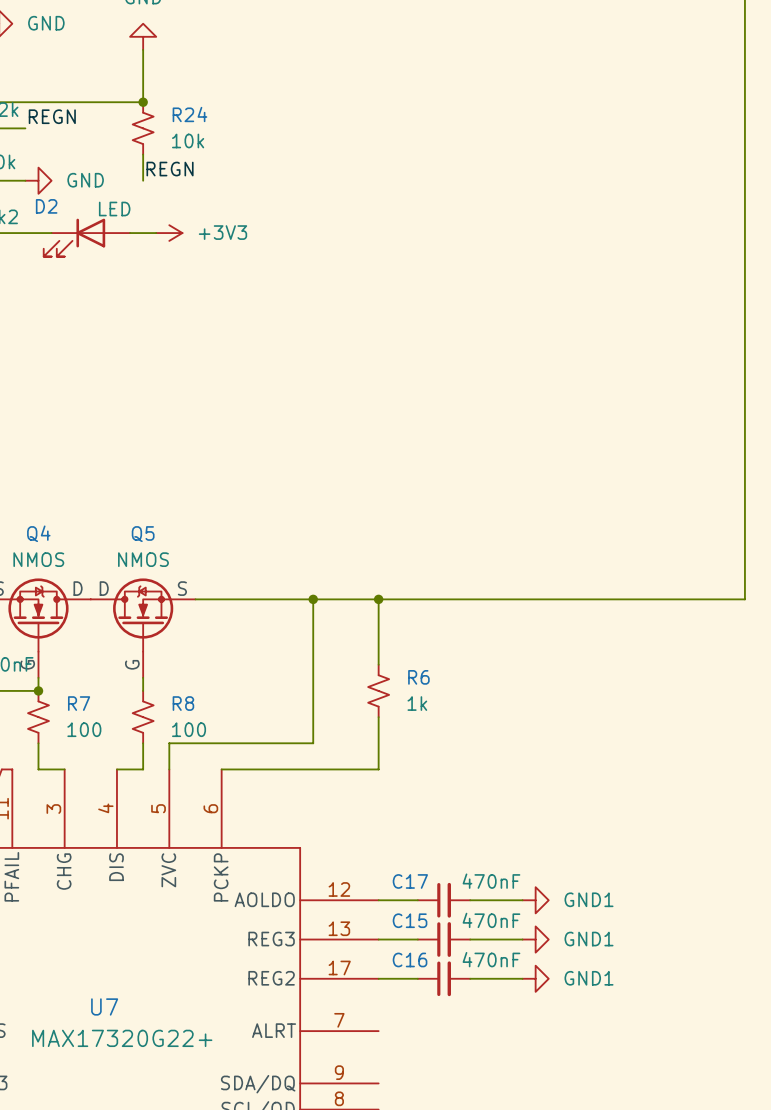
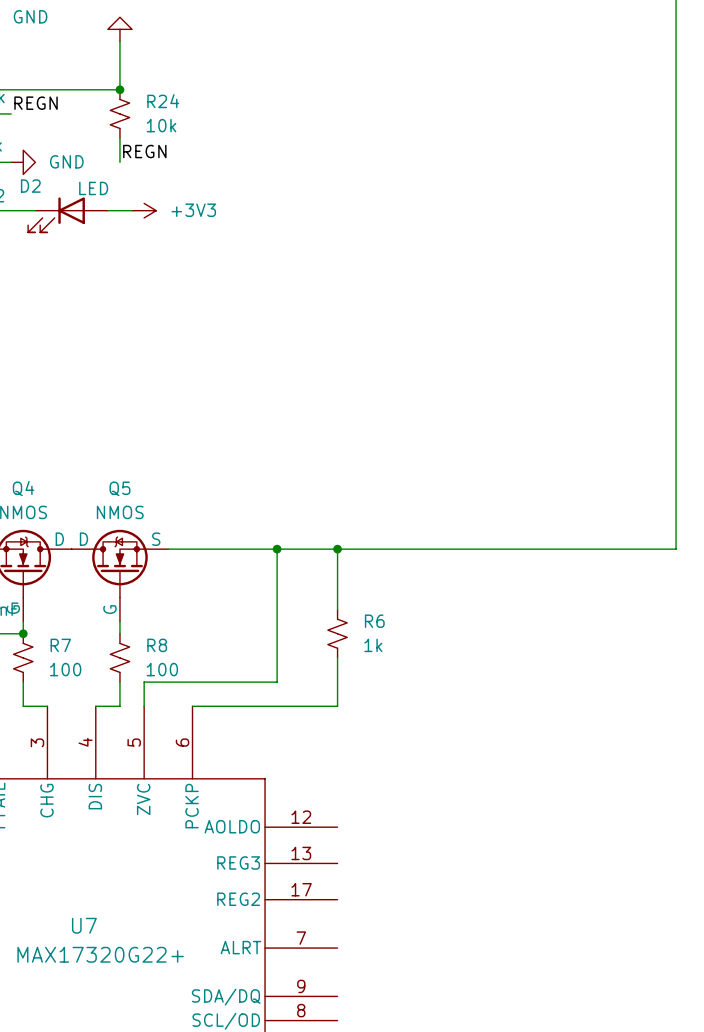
wire: (378, 900) (417, 900) -> none
C17: 470nF (444, 900) -> none
wire: (470, 900) (522, 900) -> none
power symbol: GND1 (535, 900) -> none
wire: (378, 939) (417, 939) -> none
C15: 470nF (444, 939) -> none
wire: (470, 939) (522, 939) -> none
power symbol: GND1 (535, 939) -> none
wire: (378, 978) (417, 978) -> none
C16: 470nF (444, 978) -> none
wire: (470, 978) (522, 978) -> none
power symbol: GND1 (535, 978) -> none

